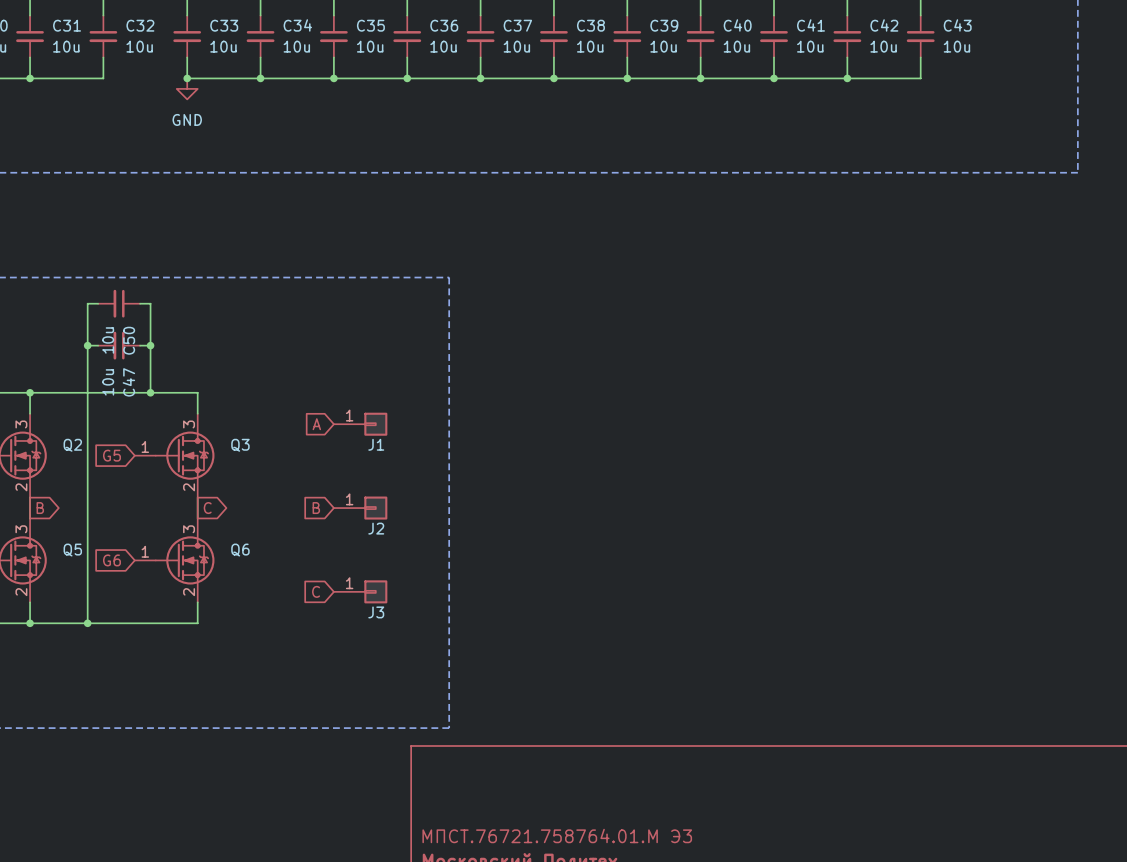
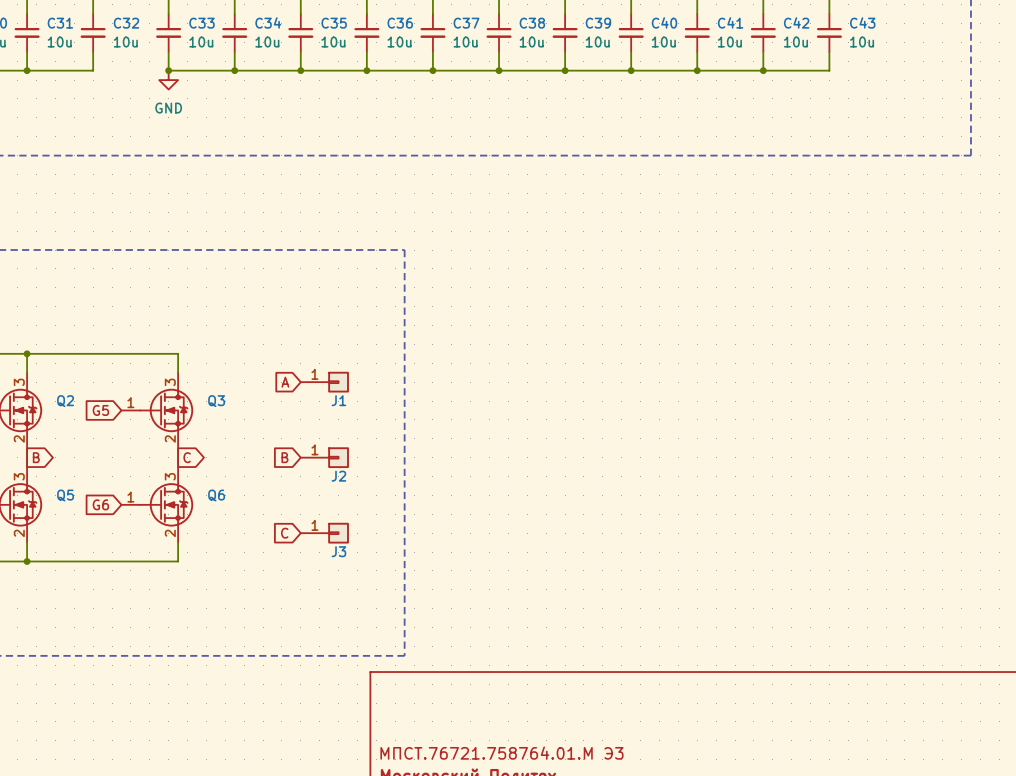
wire: (98, 303) (87, 303) (87, 623) -> none
C50: 10u (119, 303) -> none
wire: (140, 303) (150, 303) (150, 392) -> none
wire: (87, 345) (98, 345) -> none
junction: (87, 345) -> none
C47: 10u (119, 345) -> none
wire: (140, 345) (150, 345) -> none
junction: (150, 345) -> none
junction: (150, 392) -> none
junction: (87, 623) -> none

